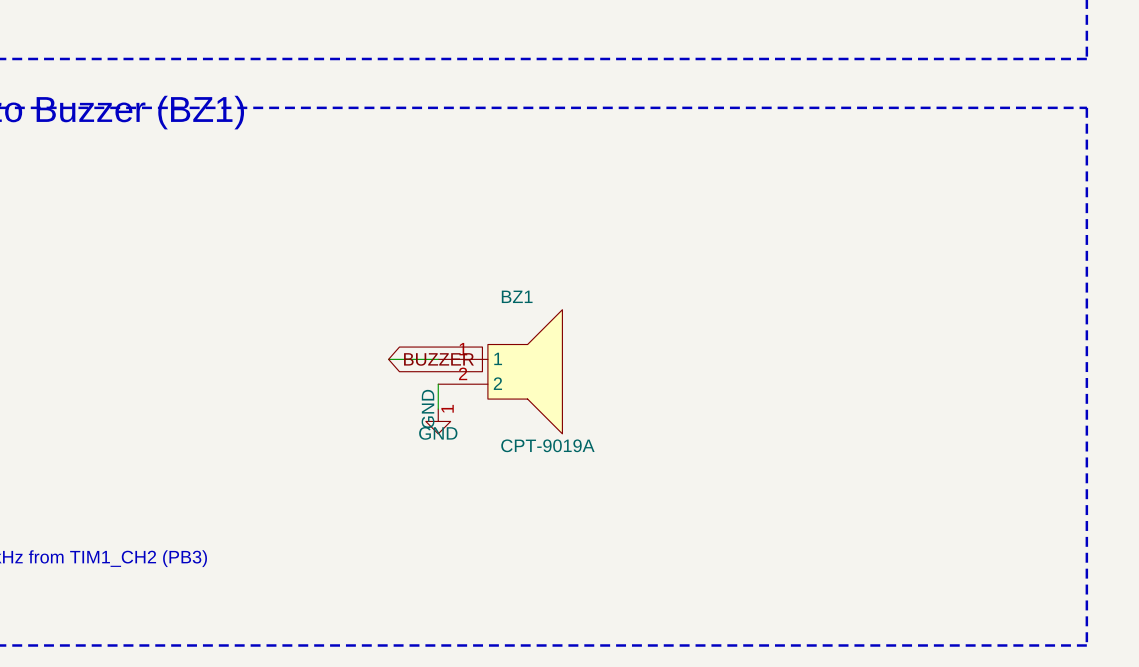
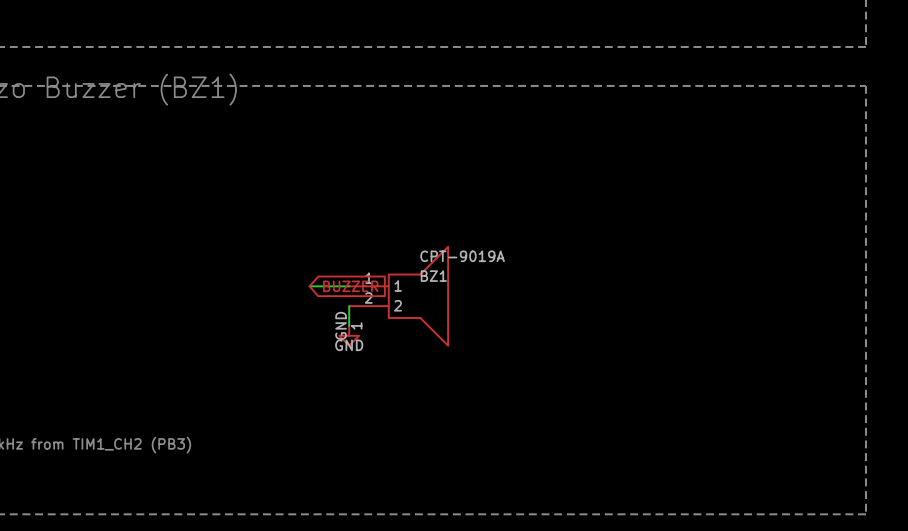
BZ1 name position: BZ1 (517, 296) -> BZ1 (433, 276)
BZ1 value position: CPT-9019A (547, 445) -> CPT-9019A (462, 256)

